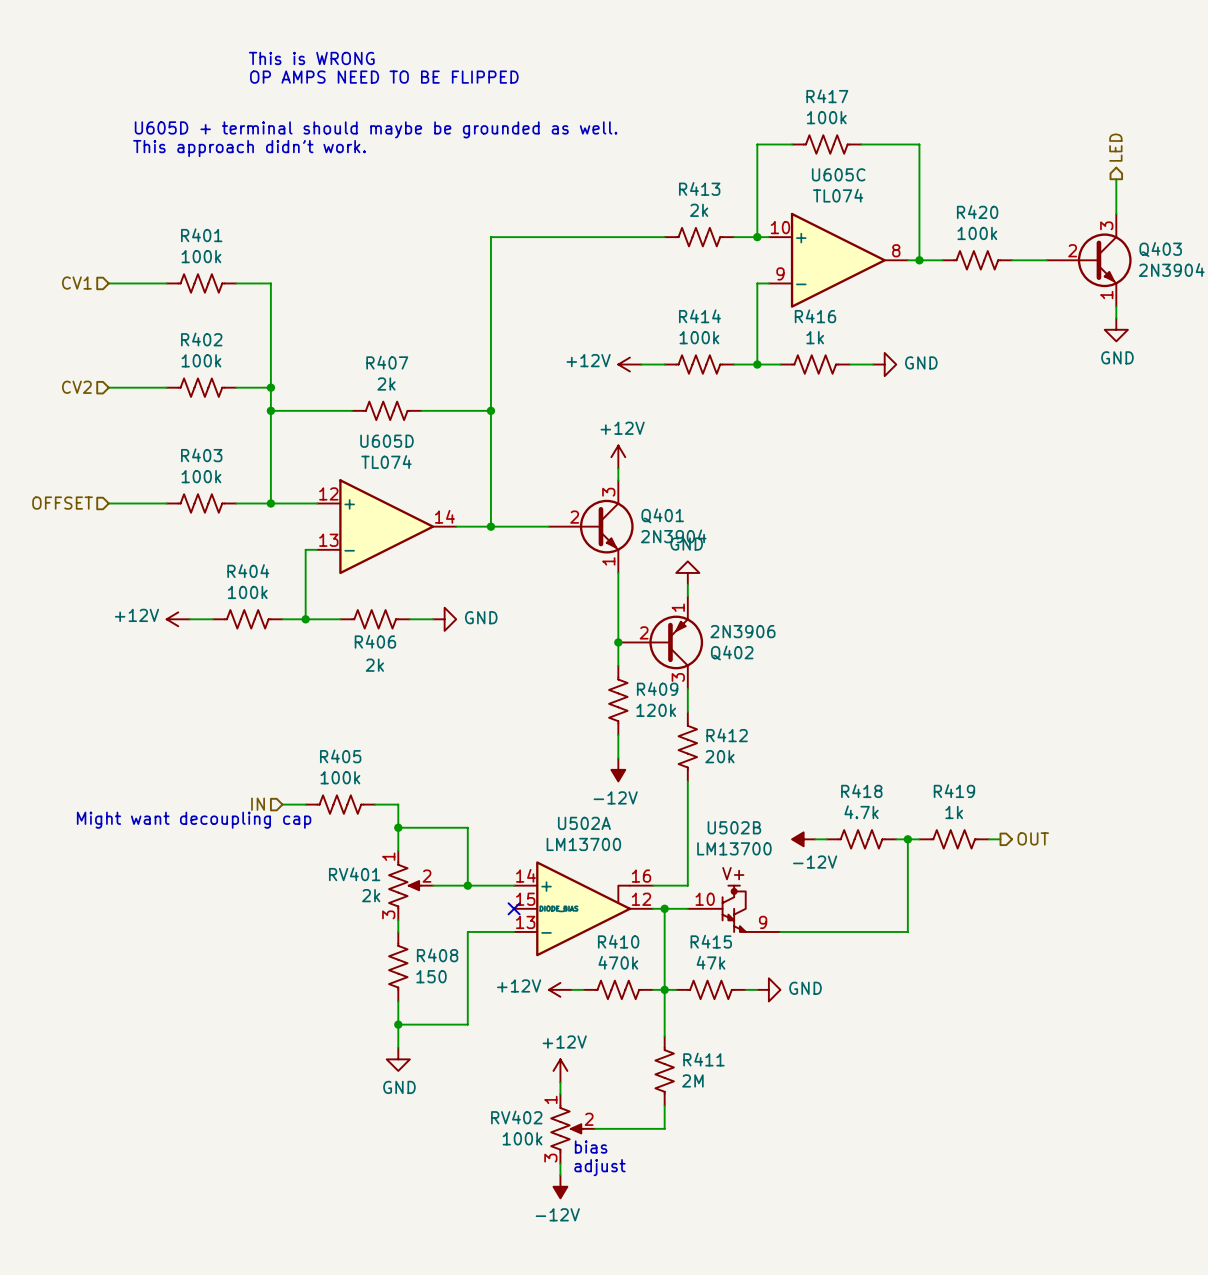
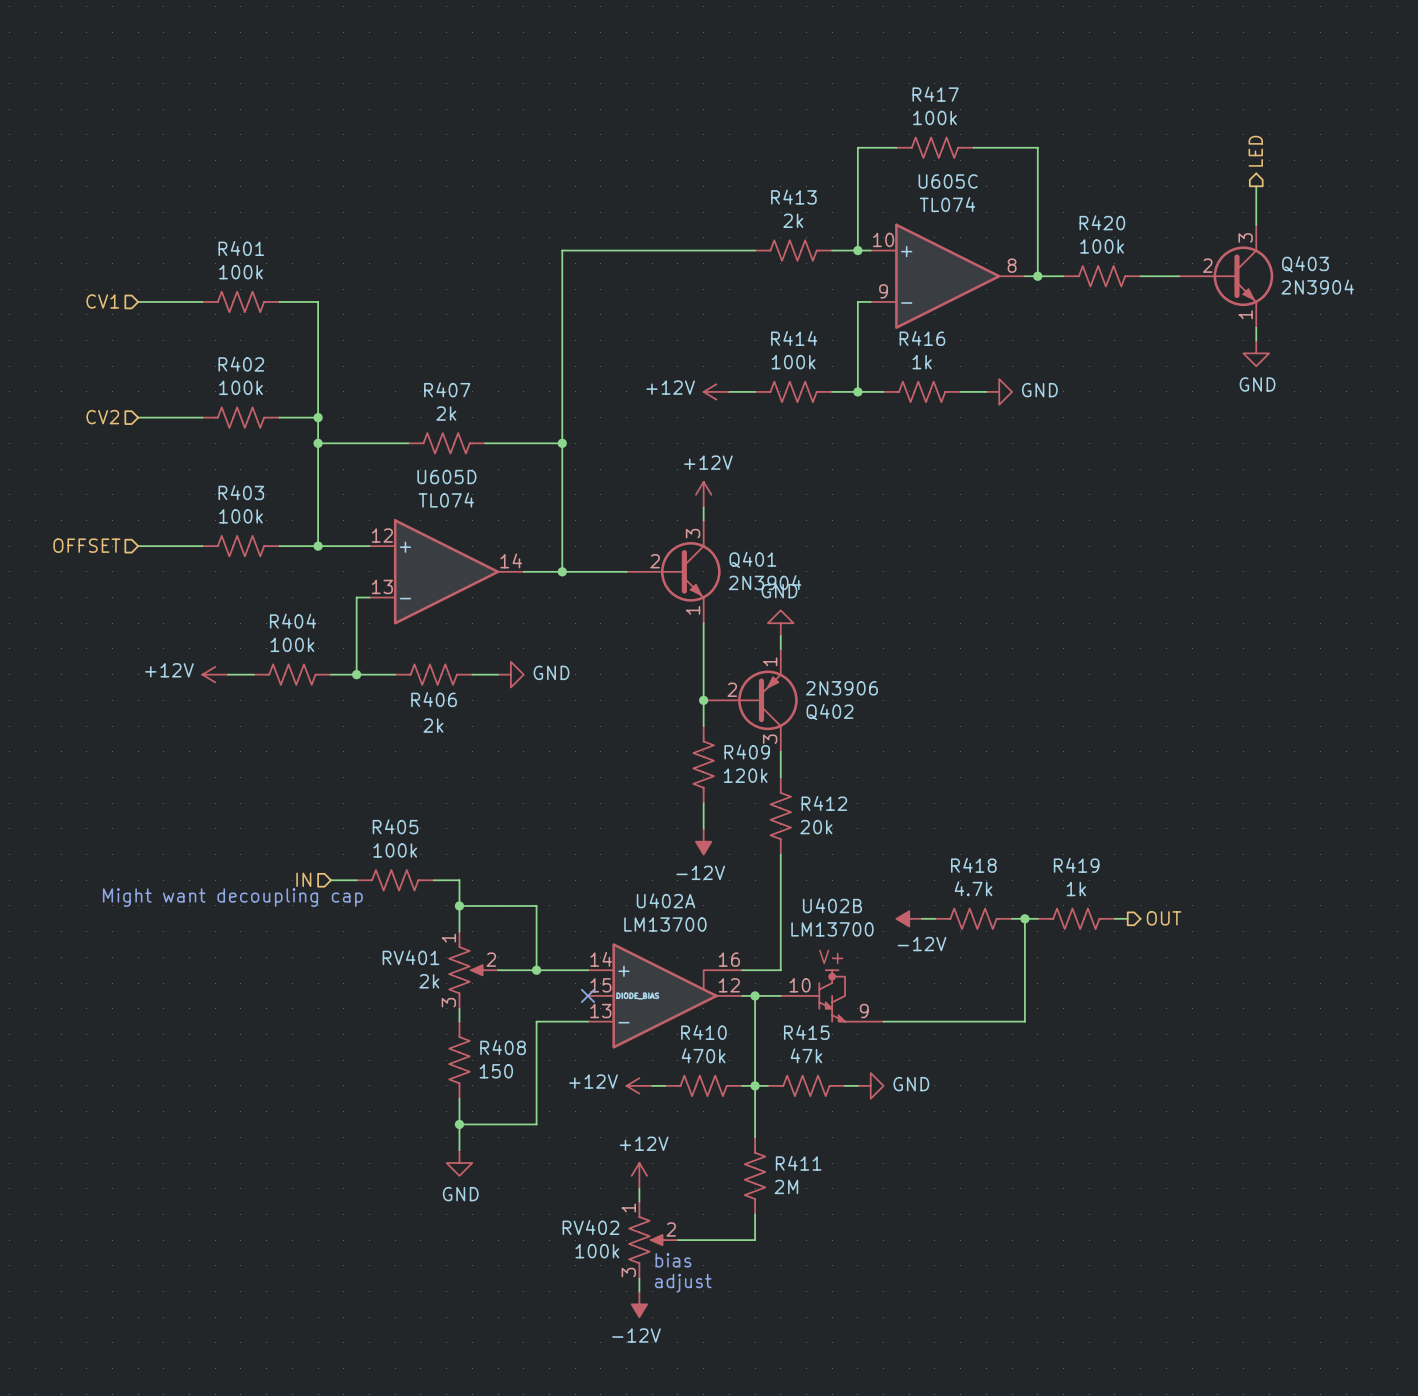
text: This is WRONG (311, 58) -> none
text: OP AMPS NEED TO BE FLIPPED (384, 77) -> none
text: U605D + terminal should maybe be grounded as well. (376, 129) -> none
text: This approach didn’t work. (249, 148) -> none
U502A name: U502A (584, 823) -> U402A (666, 900)
U502B name: U502B (734, 827) -> U402B (832, 905)

